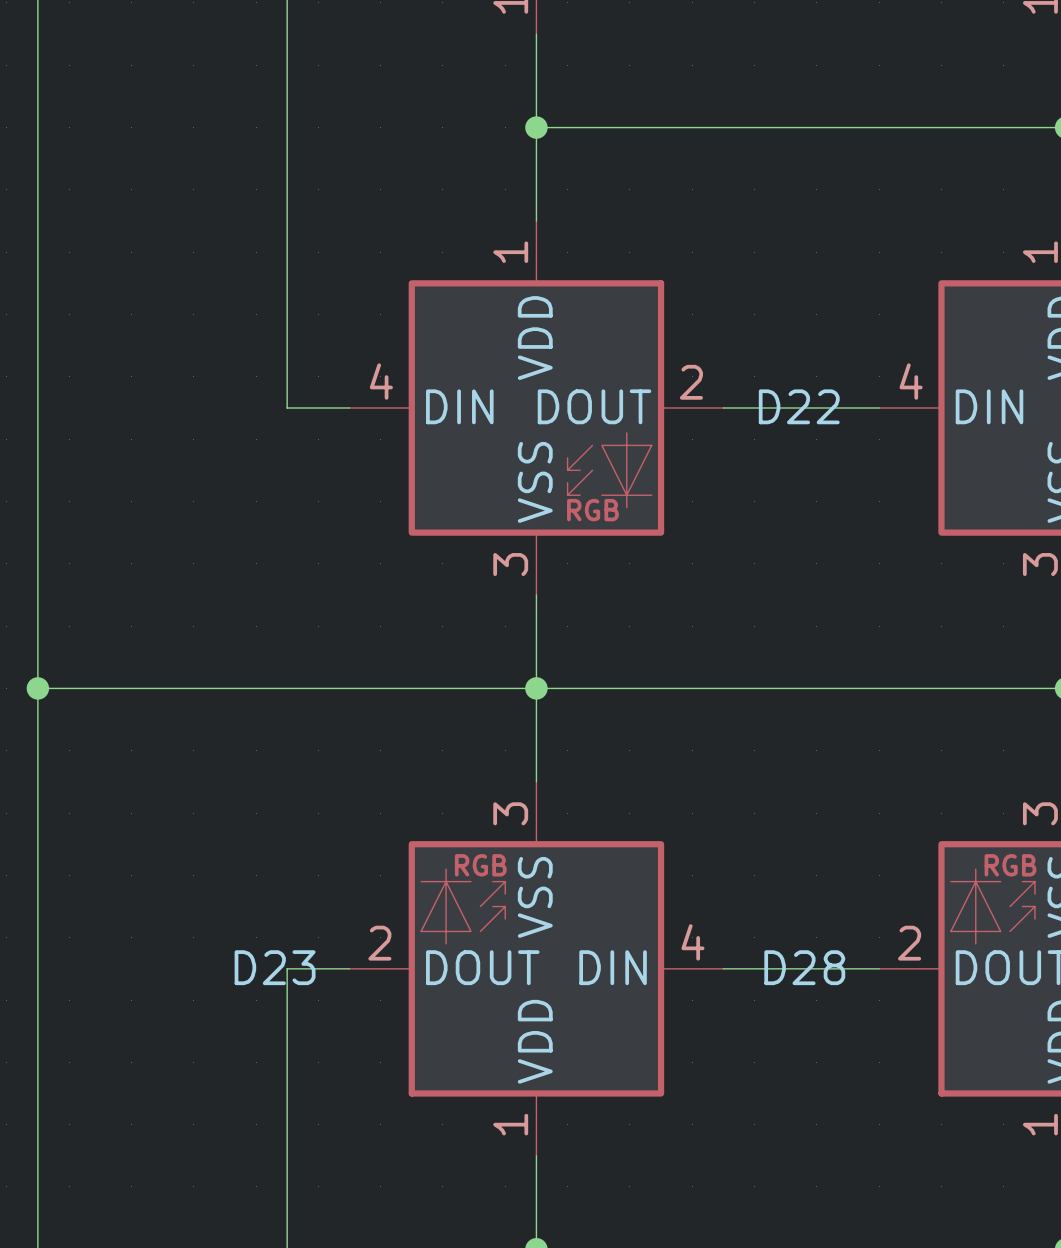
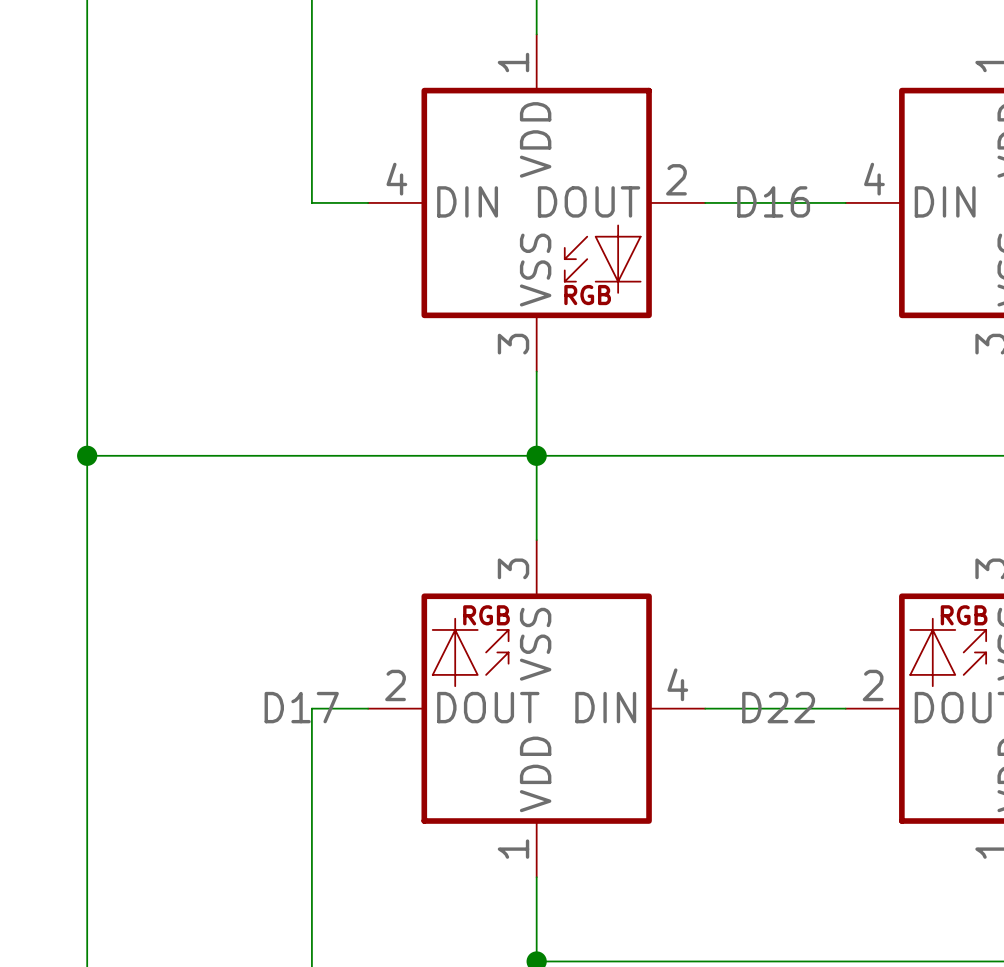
D22 name: D22 (799, 406) -> D16 (773, 201)
D23 name: D23 (275, 967) -> D17 (301, 707)
D28 name: D28 (804, 967) -> D22 (778, 707)

